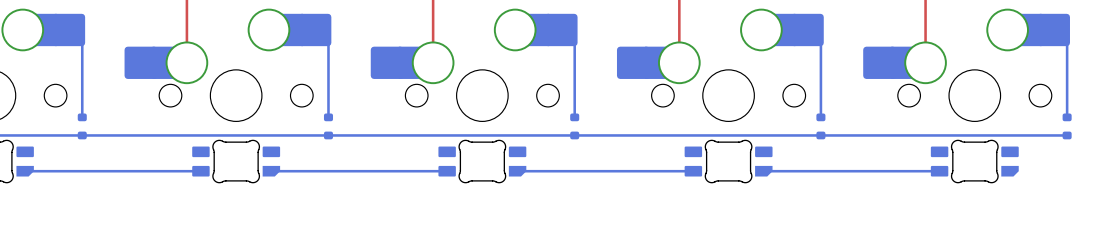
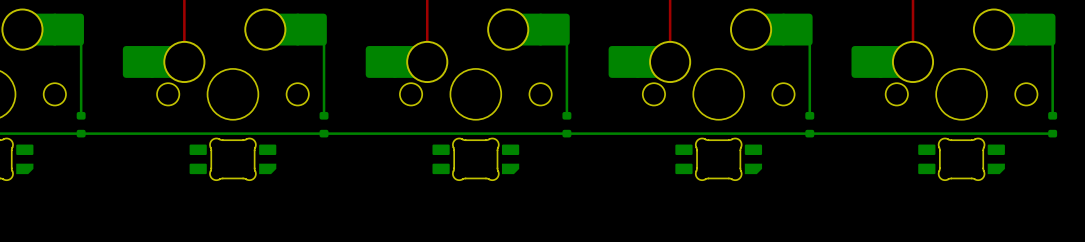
bottom track: (25, 171) (200, 171) -> none
bottom track: (271, 171) (447, 171) -> none
bottom track: (517, 171) (693, 171) -> none
bottom track: (763, 171) (939, 171) -> none

